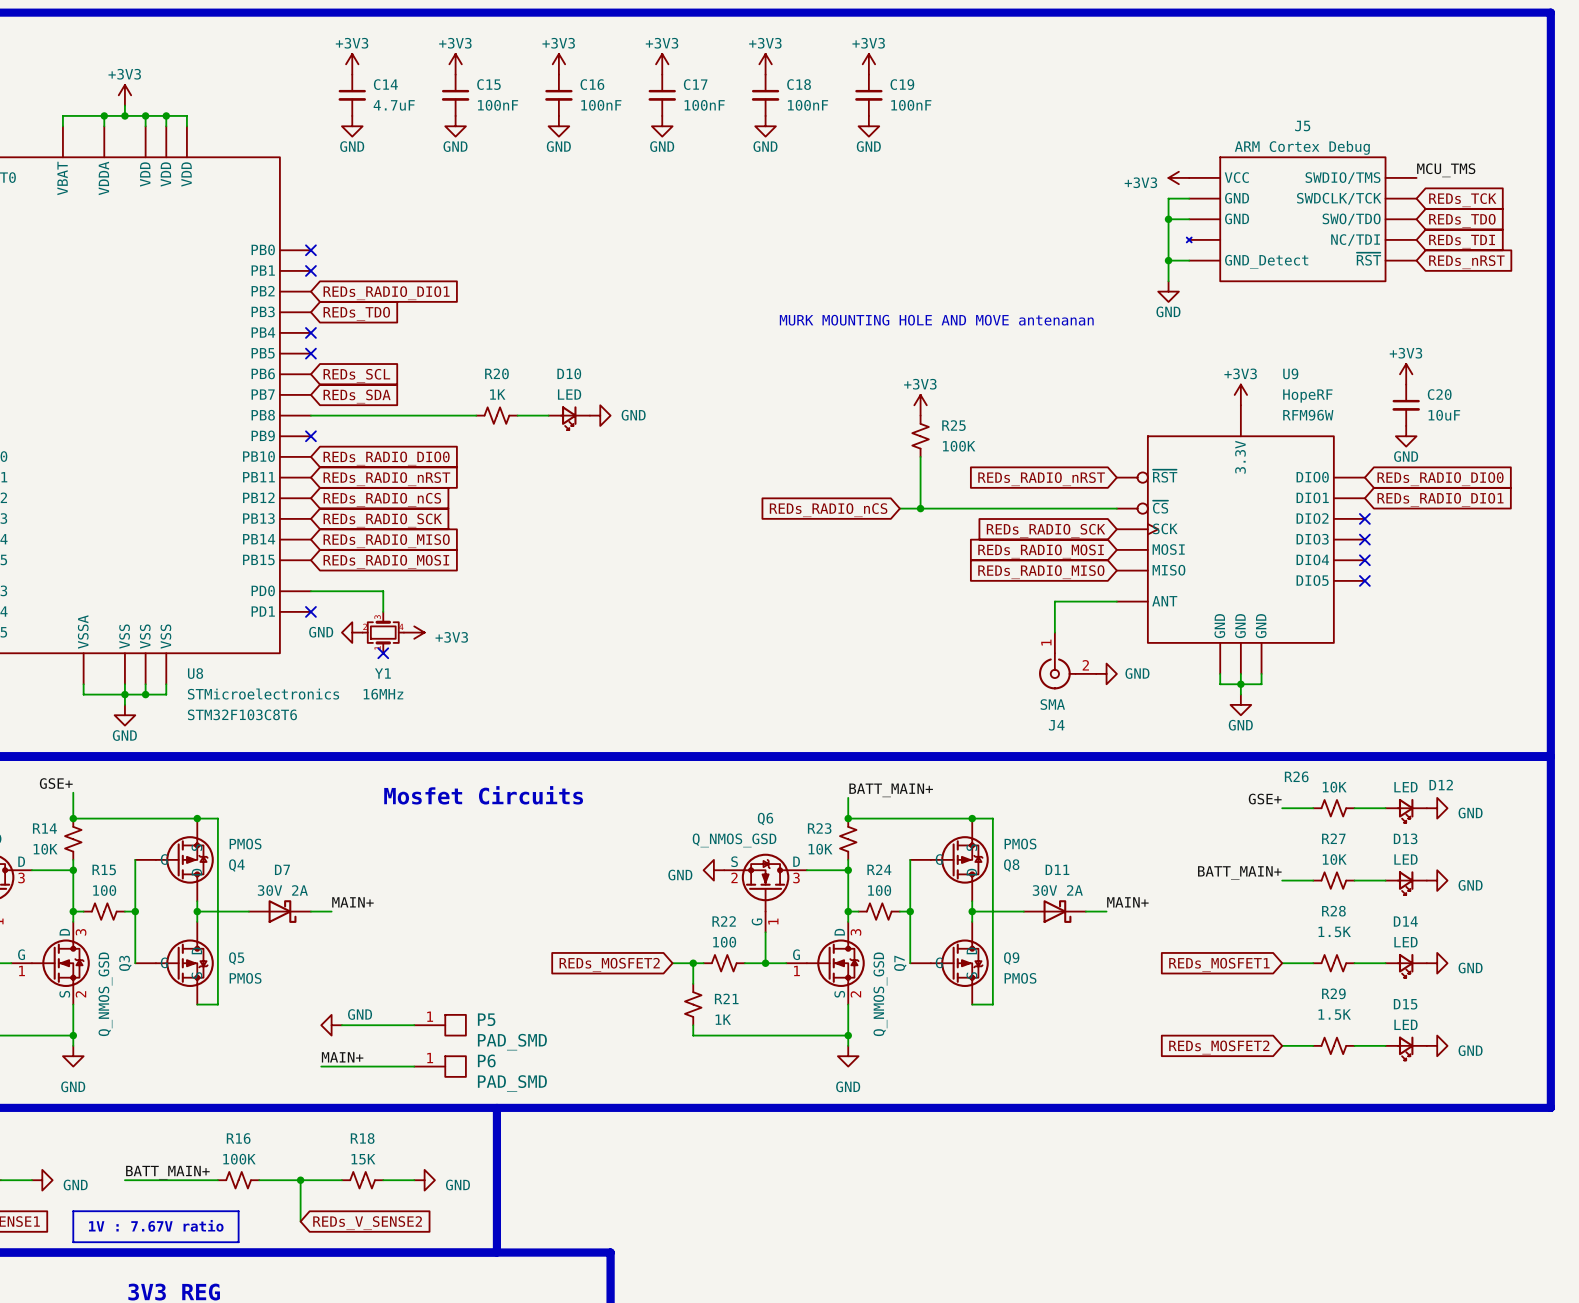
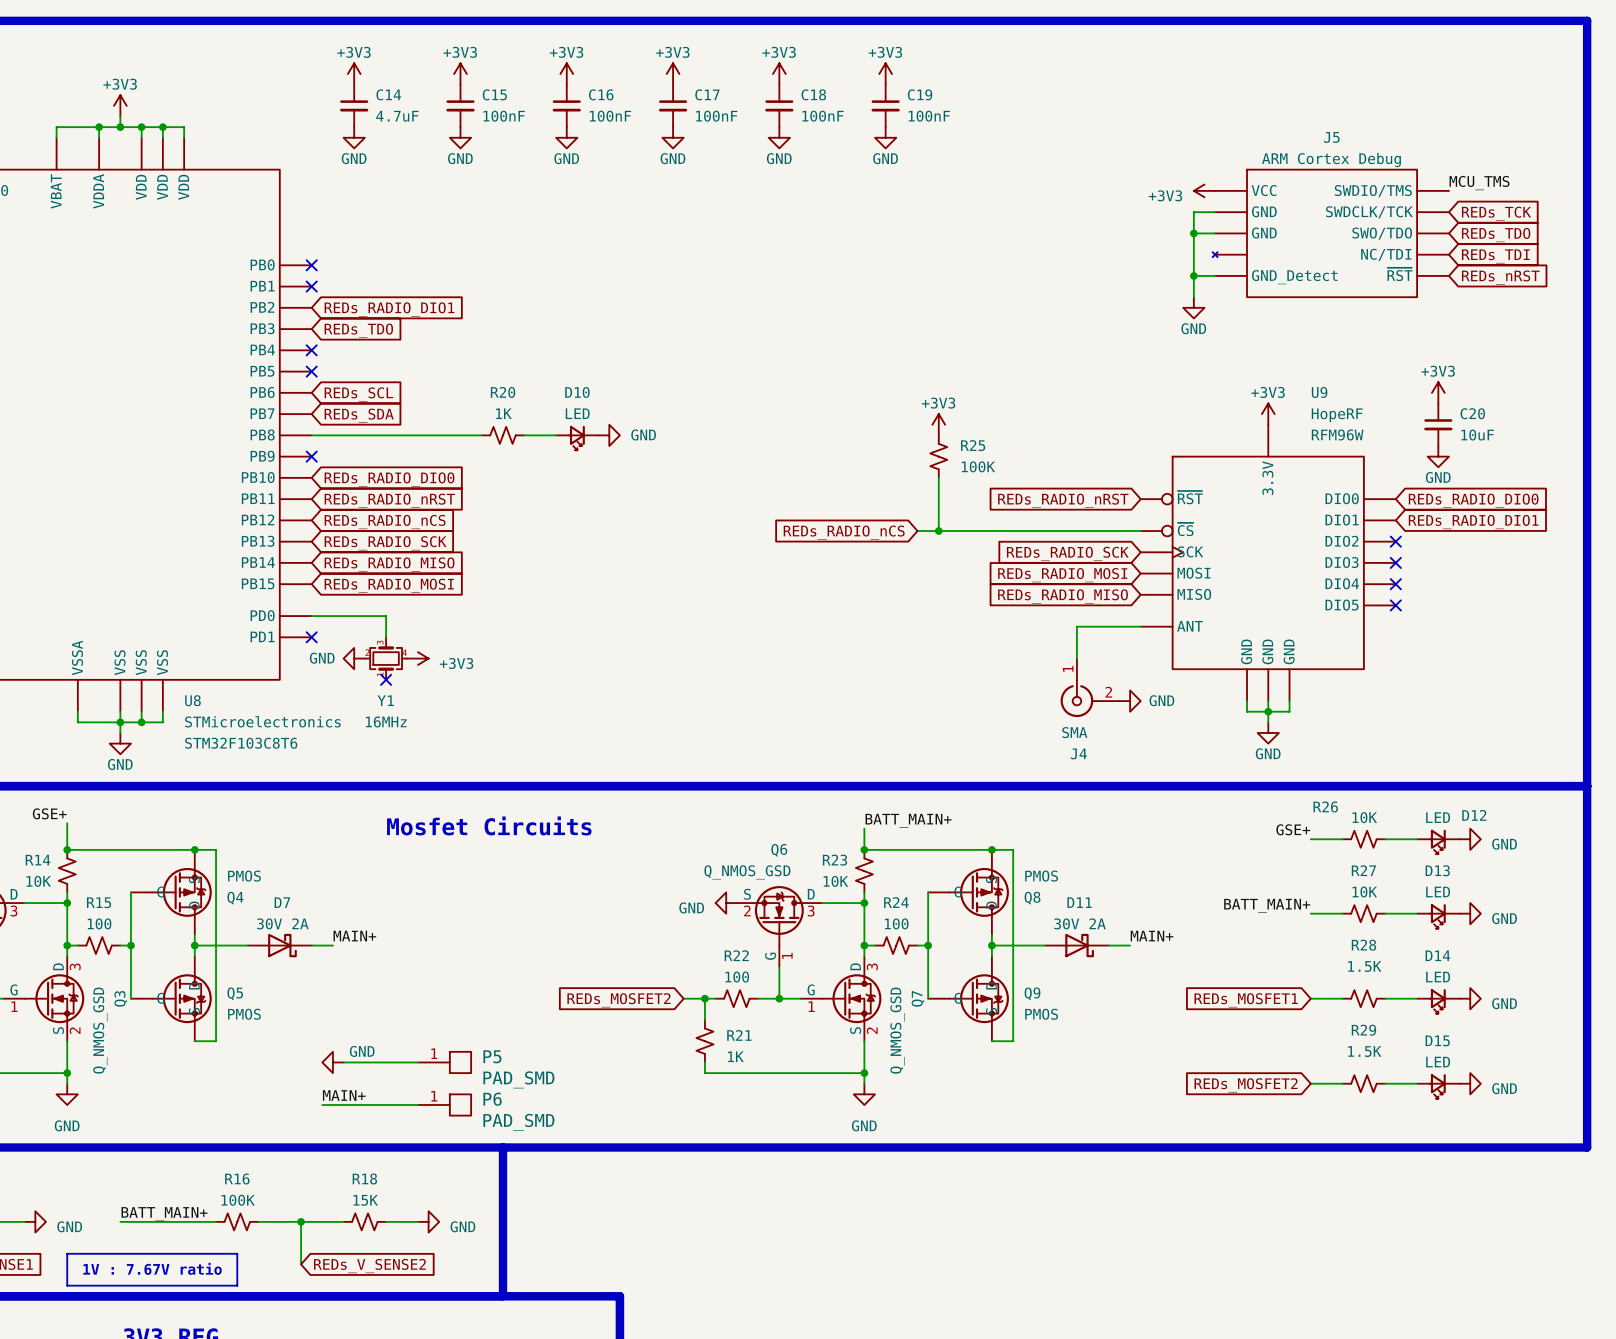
text: MURK MOUNTING HOLE AND MOVE antenanan (936, 320) -> none

